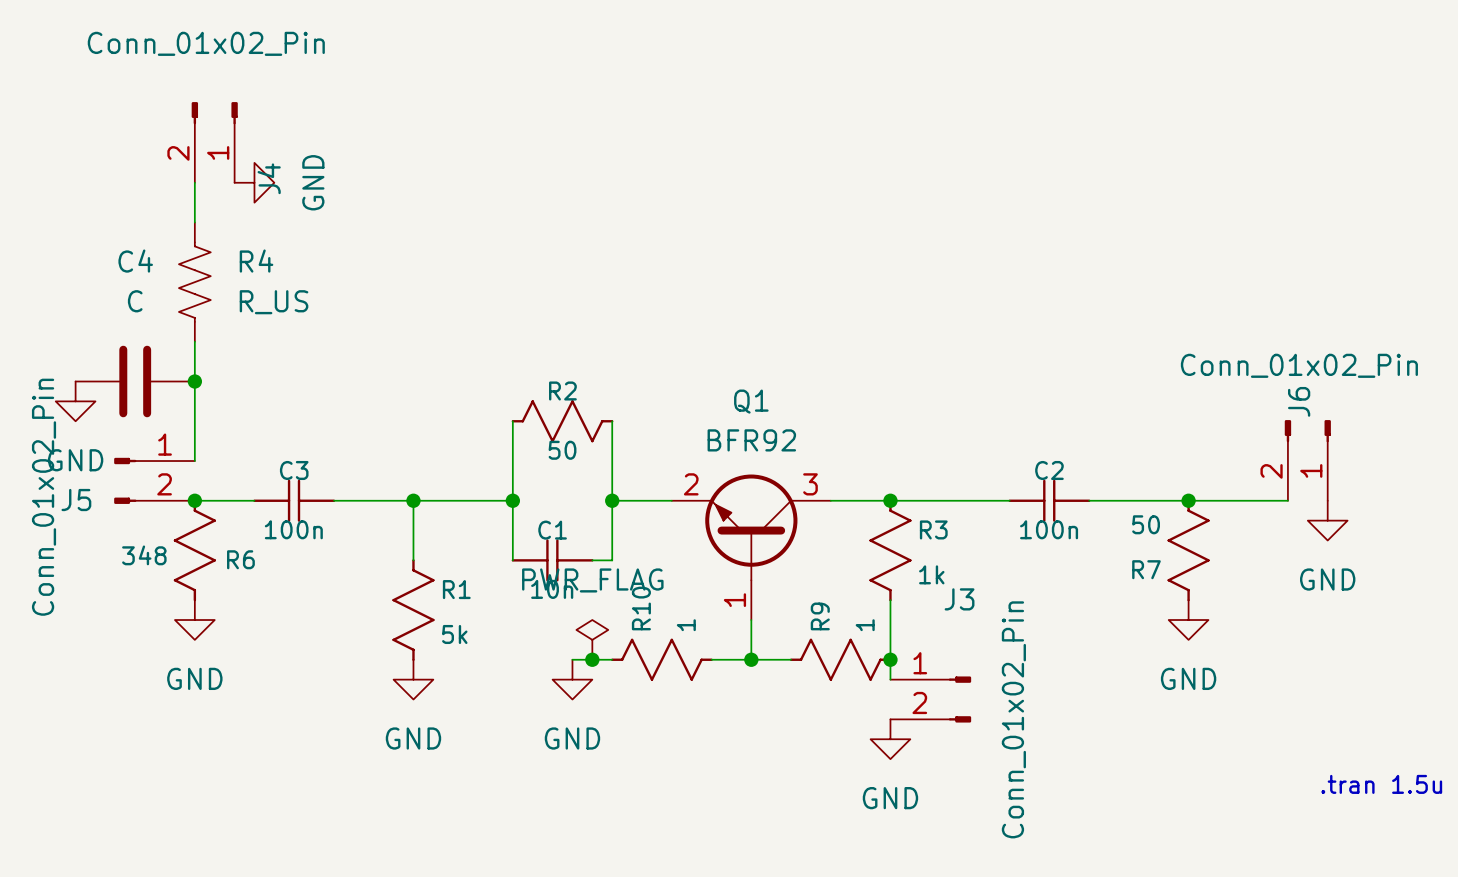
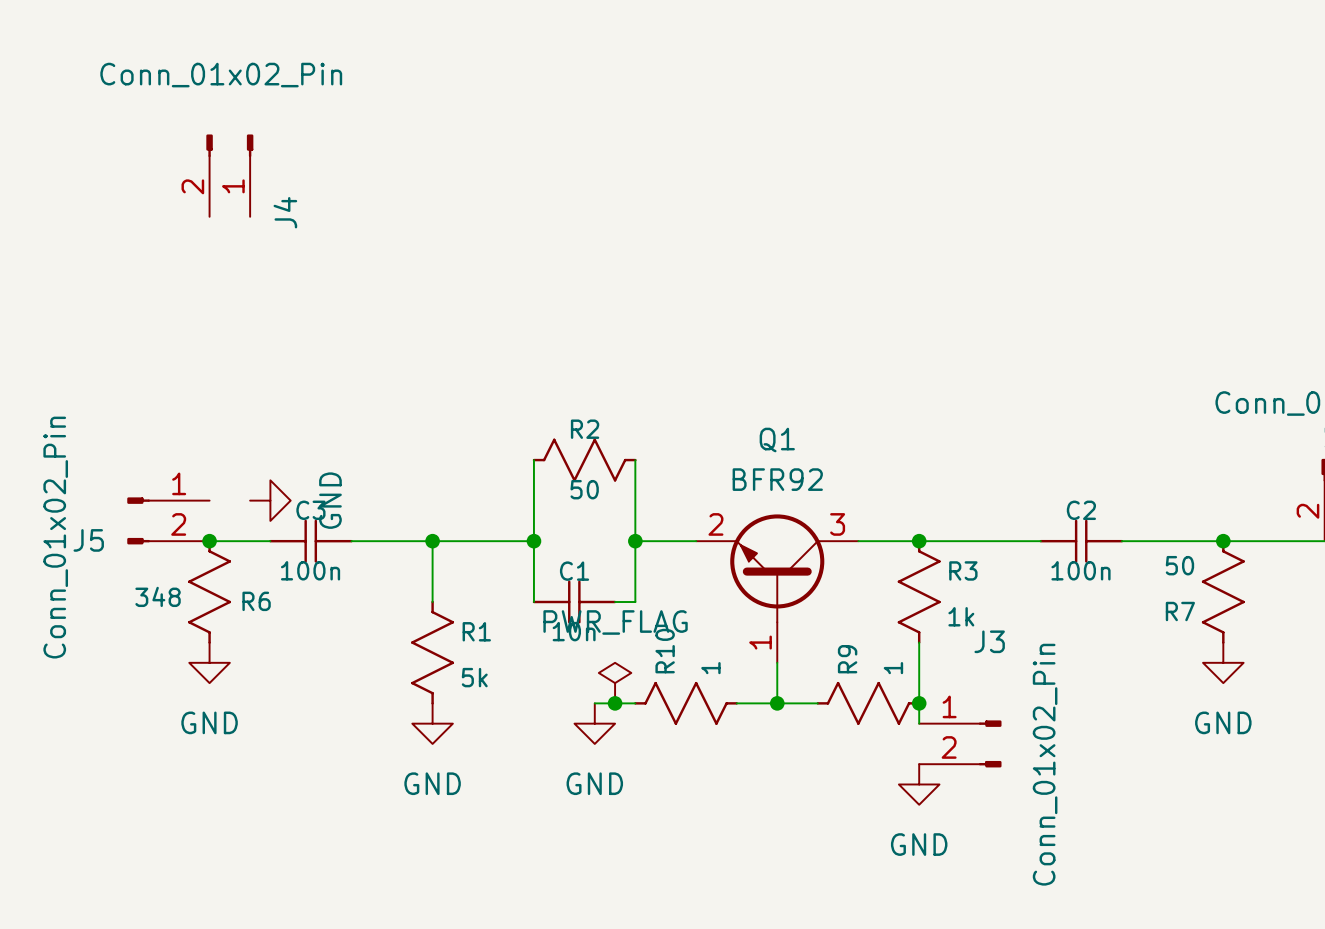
wire: (194, 182) (194, 222) -> none
power symbol: GND (254, 182) -> none
R4: R_US (194, 282) -> none
wire: (194, 341) (194, 461) -> none
C4: C (135, 381) -> none
junction: (194, 381) -> none
power symbol: GND (75, 401) -> none
power symbol: none -> GND (270, 500)

